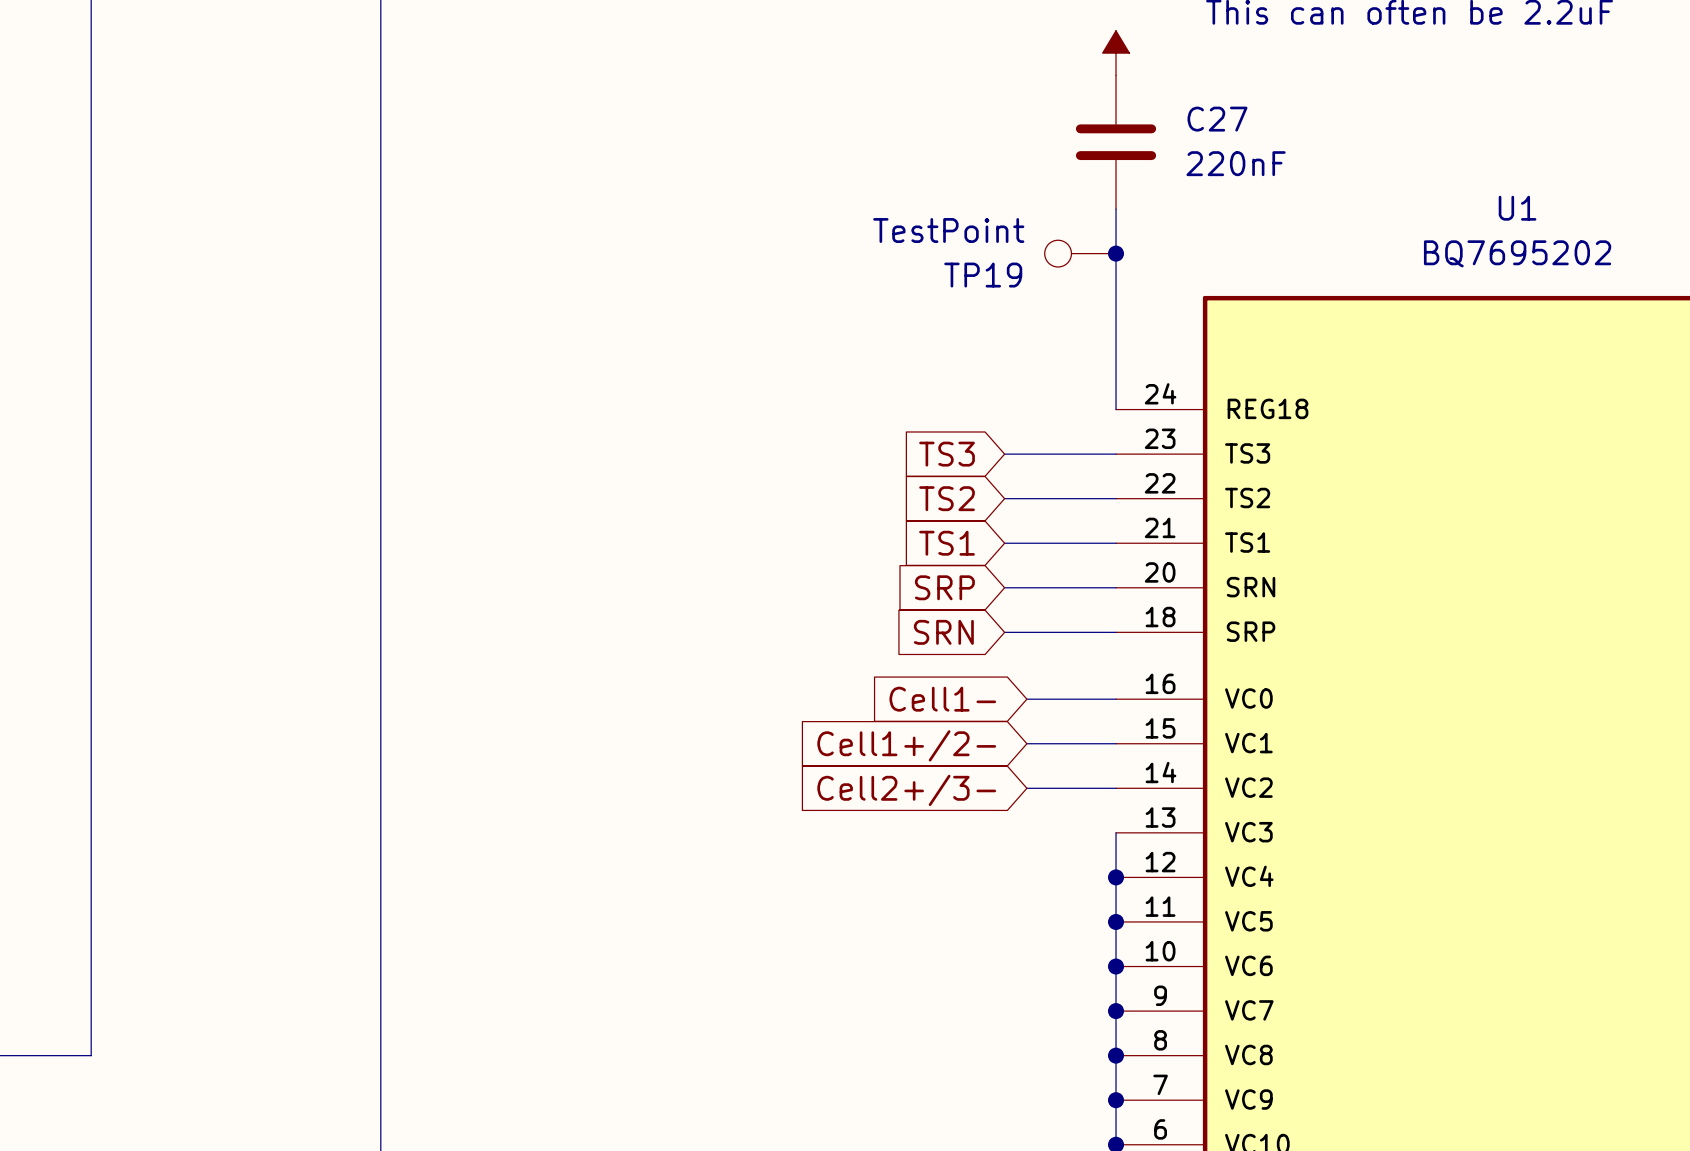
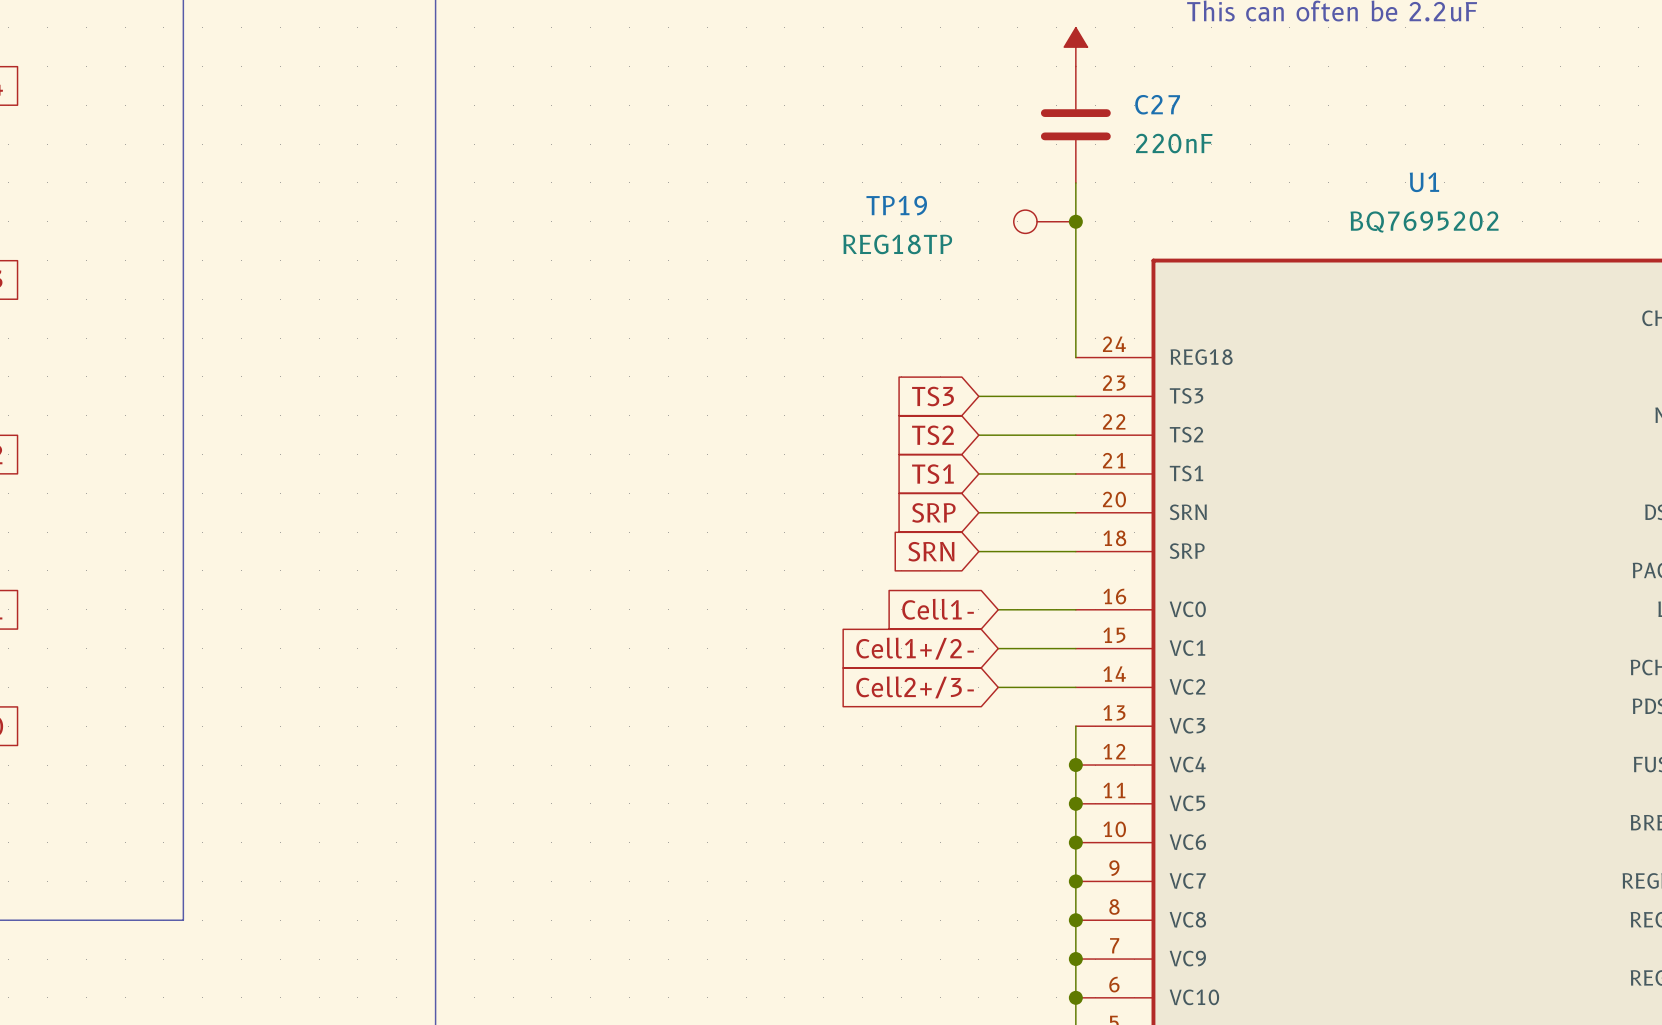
TP19 value: TestPoint (948, 230) -> REG18TP (897, 244)
TP19 name position: TP19 (983, 275) -> TP19 (896, 205)

